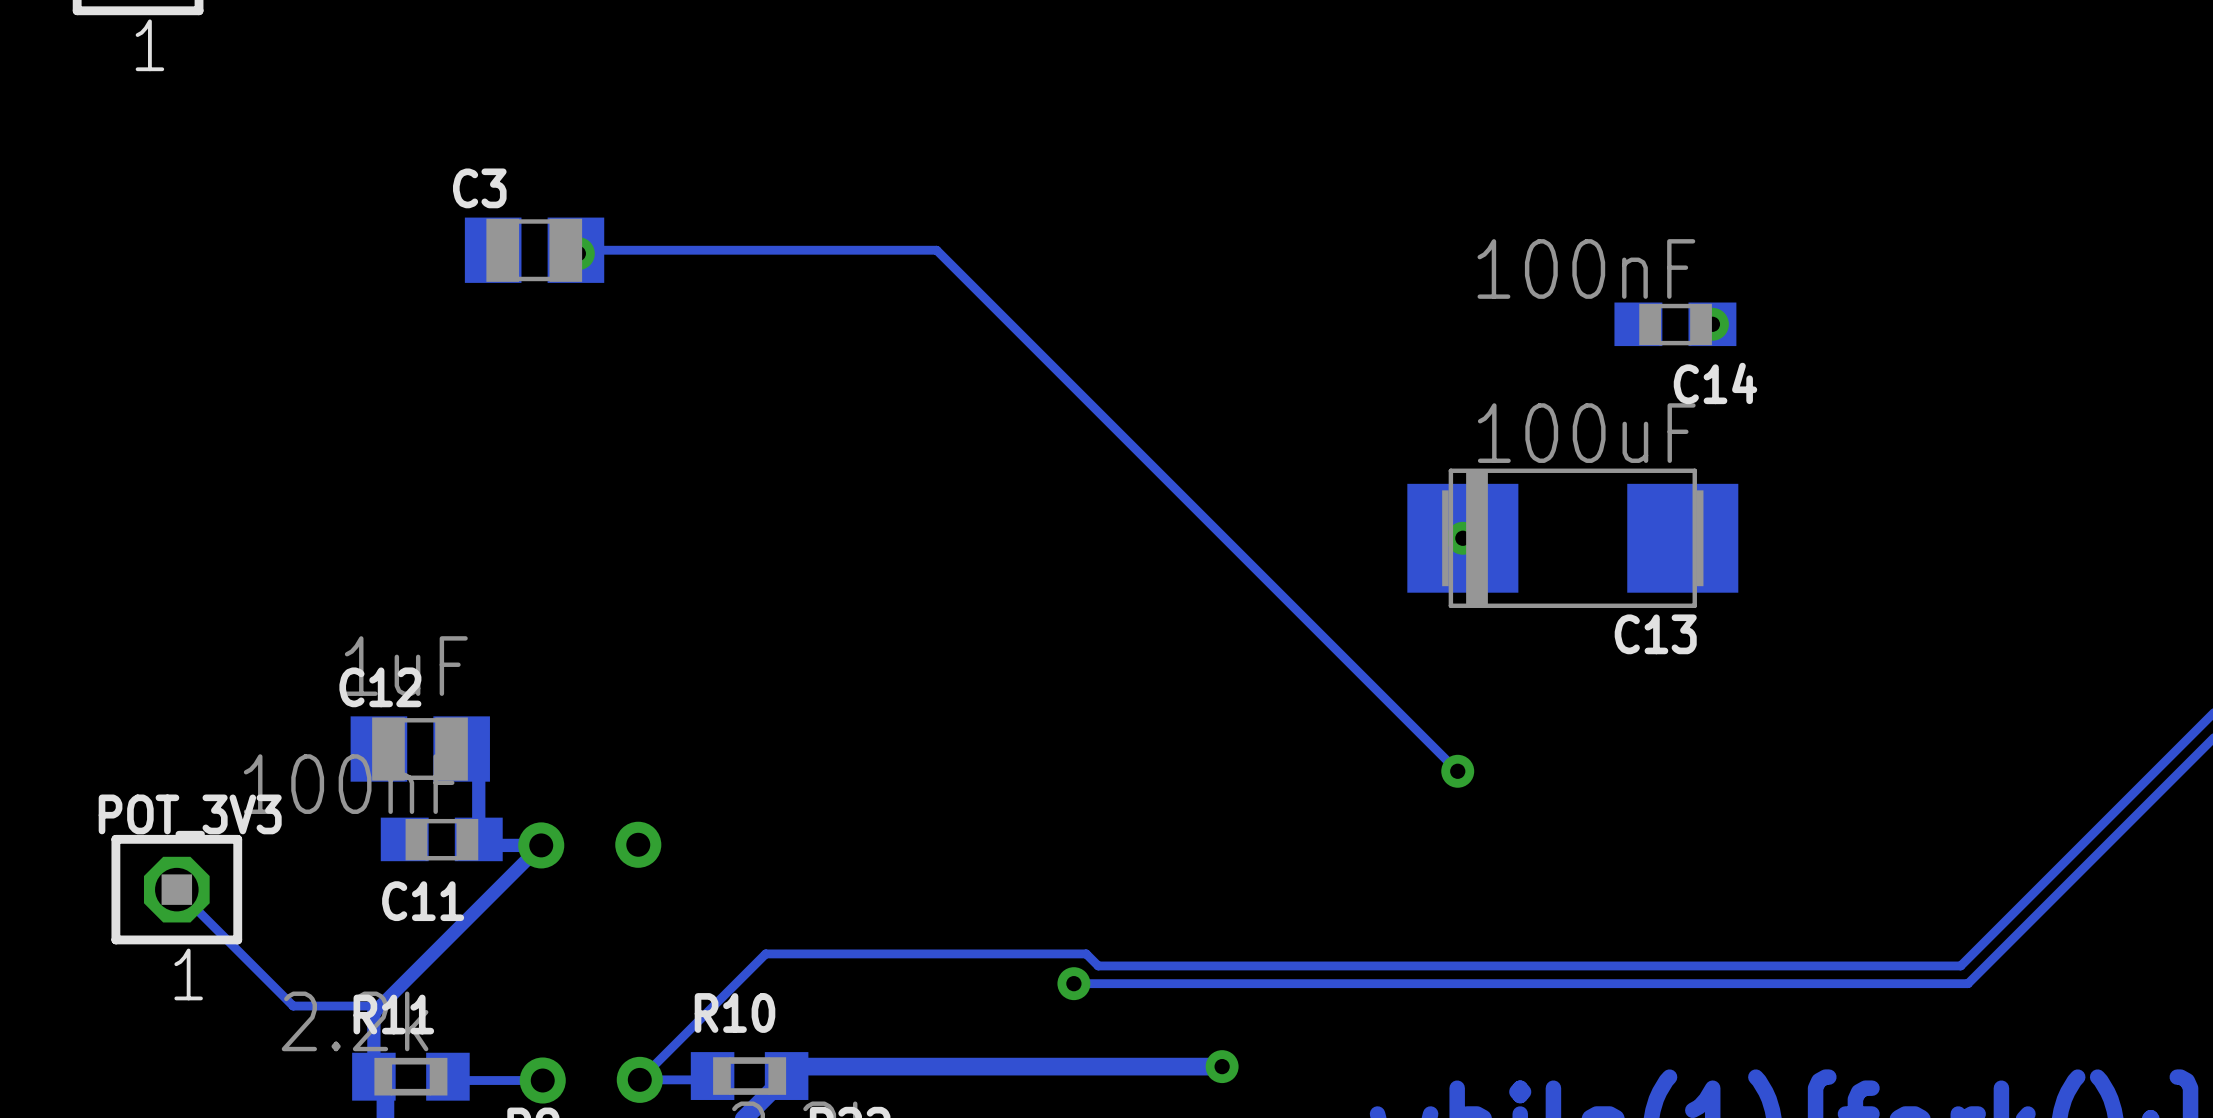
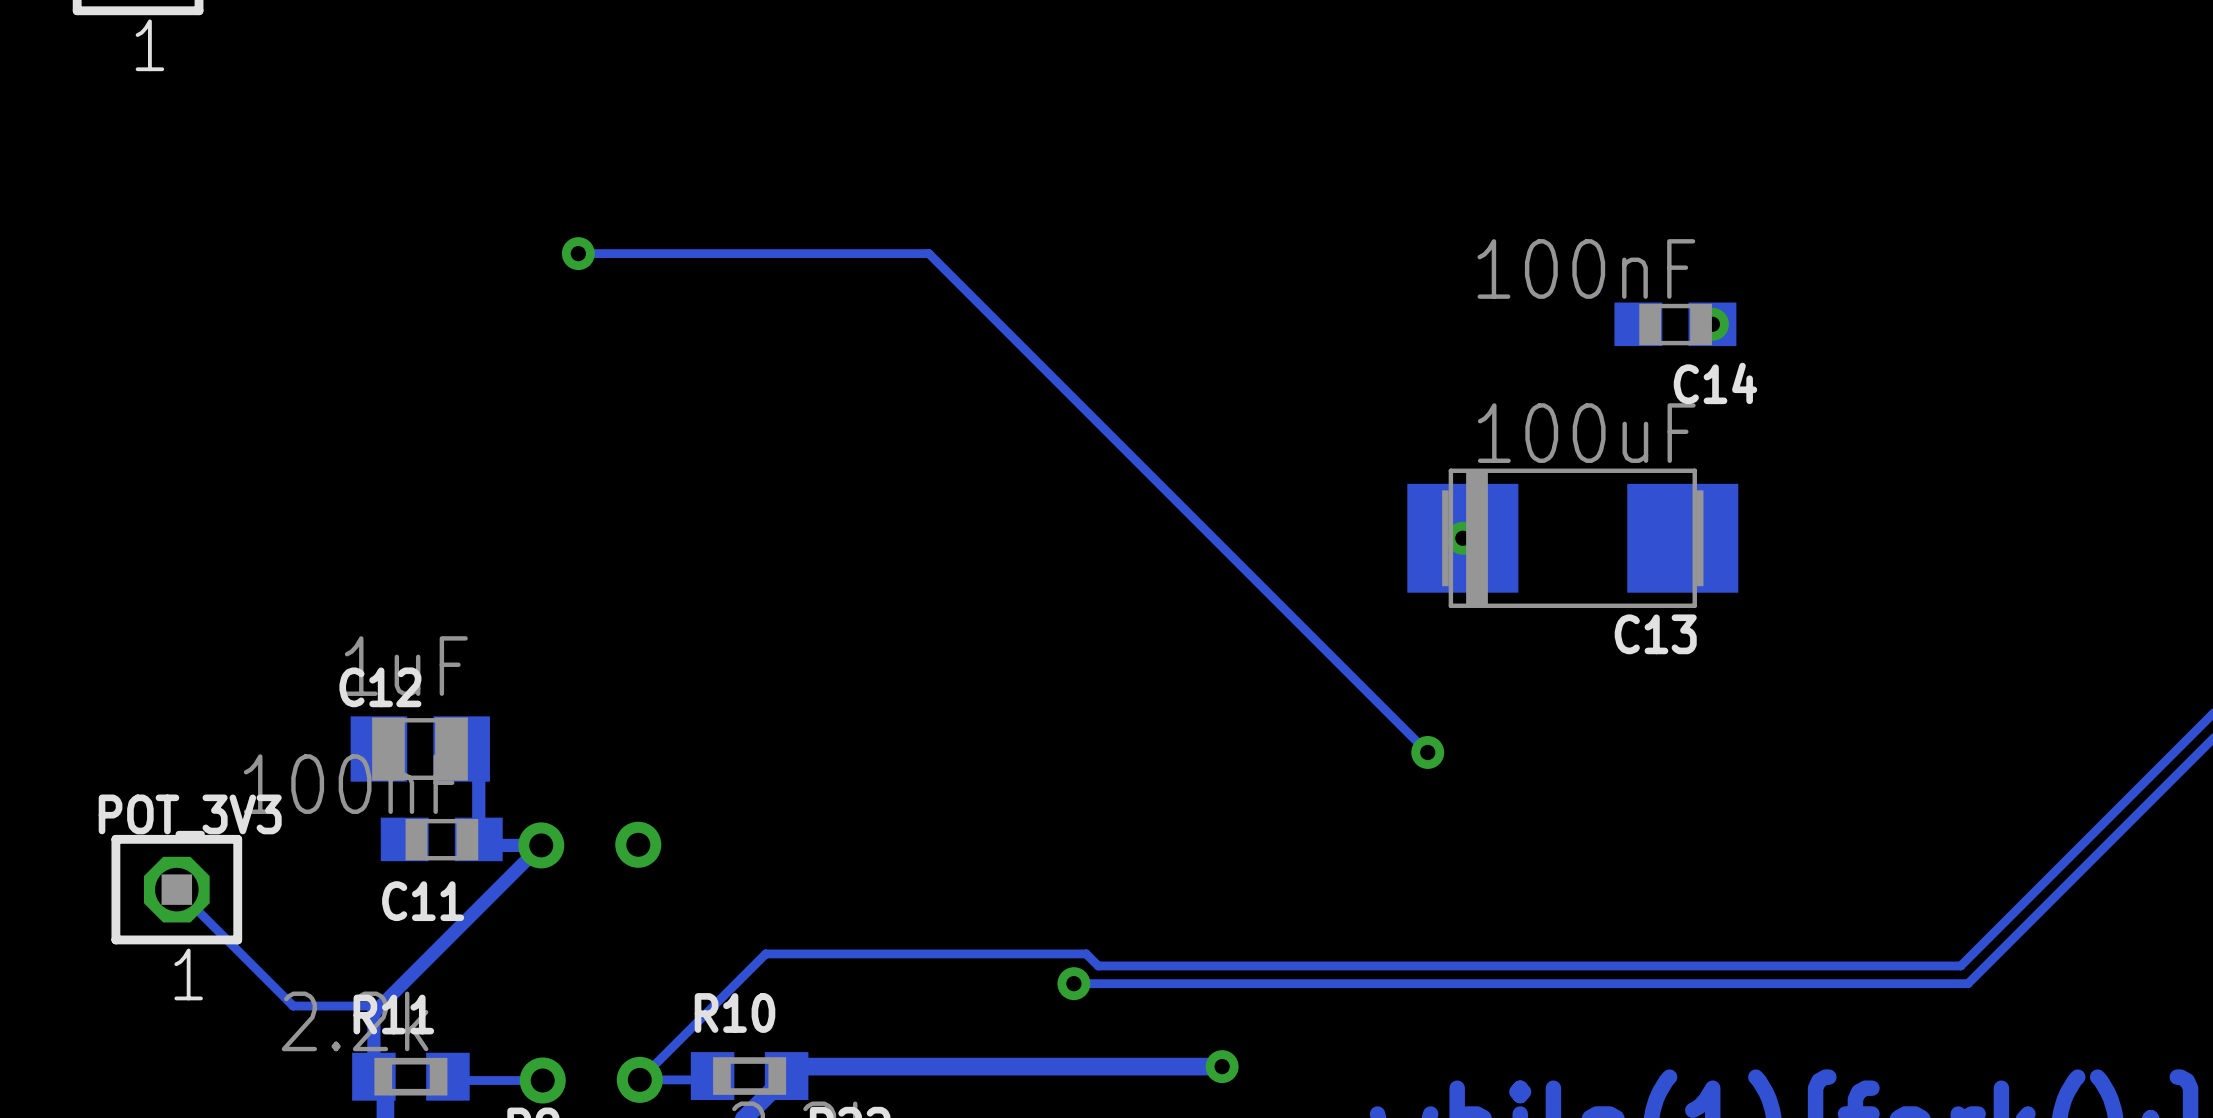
C3: (534, 250) -> none
track: (578, 253) (575, 250) (936, 250) (1457, 771) -> (578, 253) (928, 253) (1427, 752)
via position: (1457, 771) -> (1427, 752)

